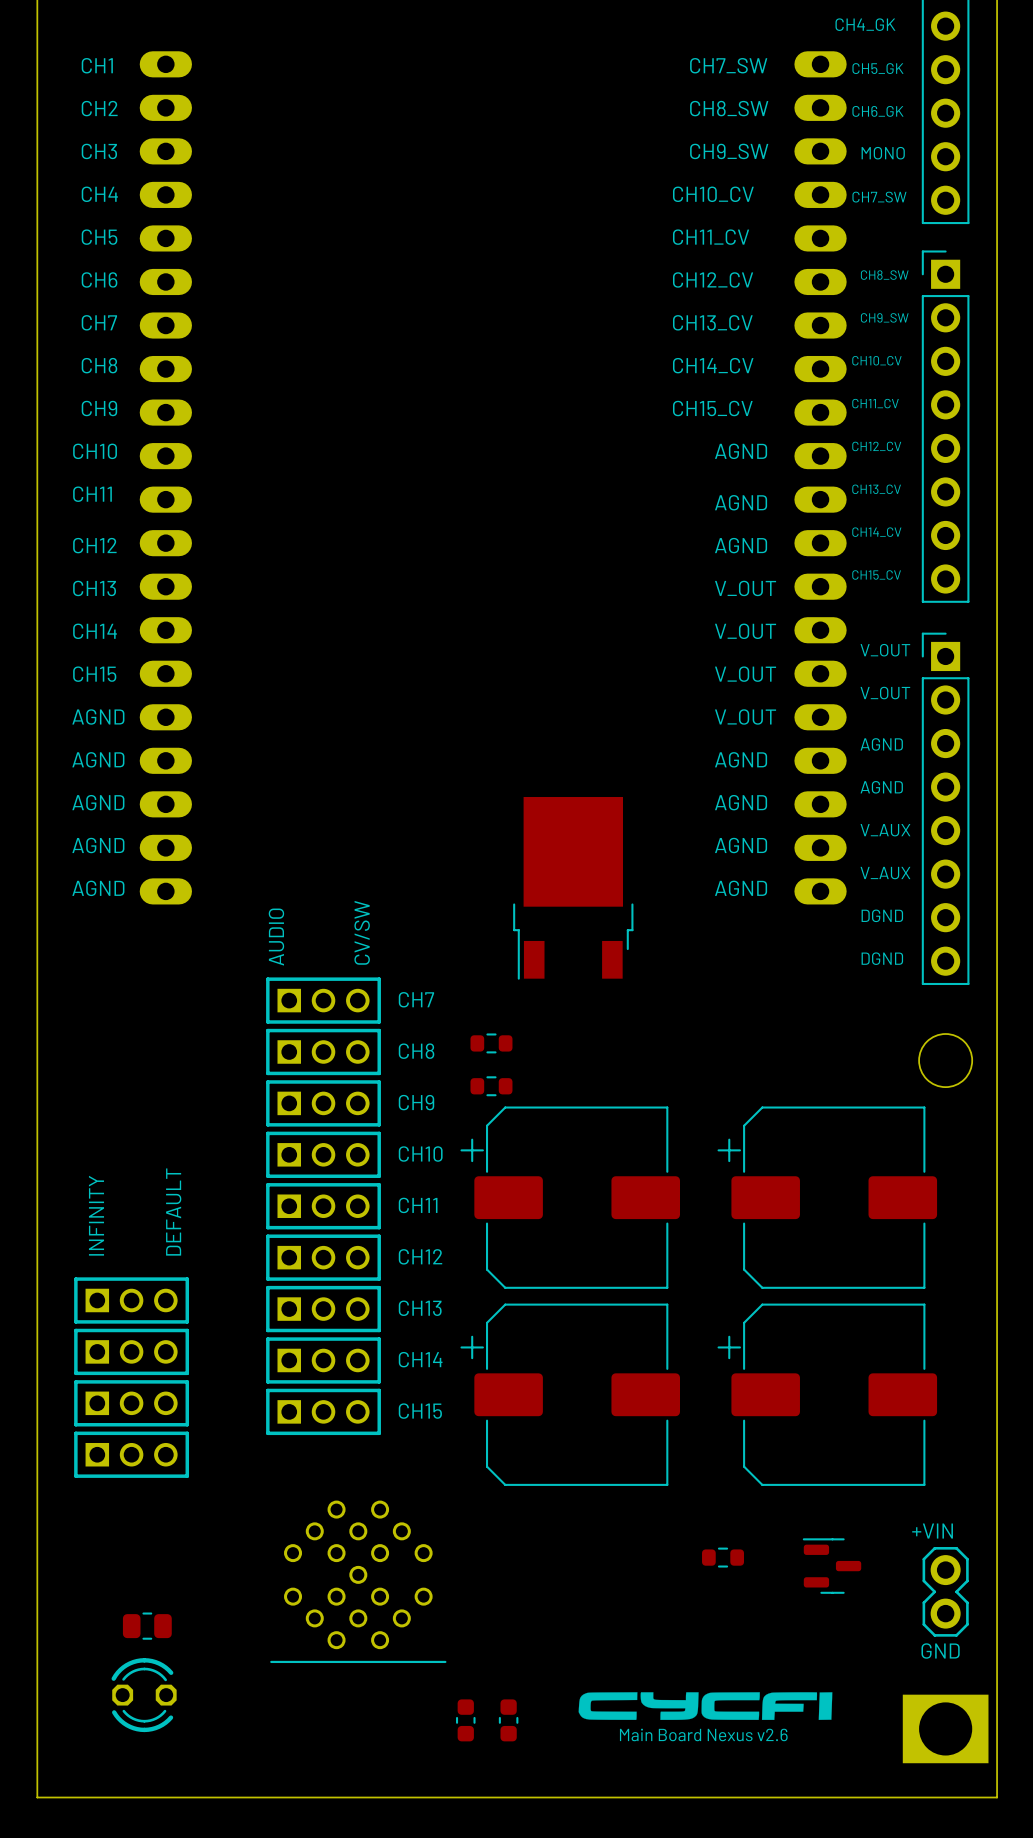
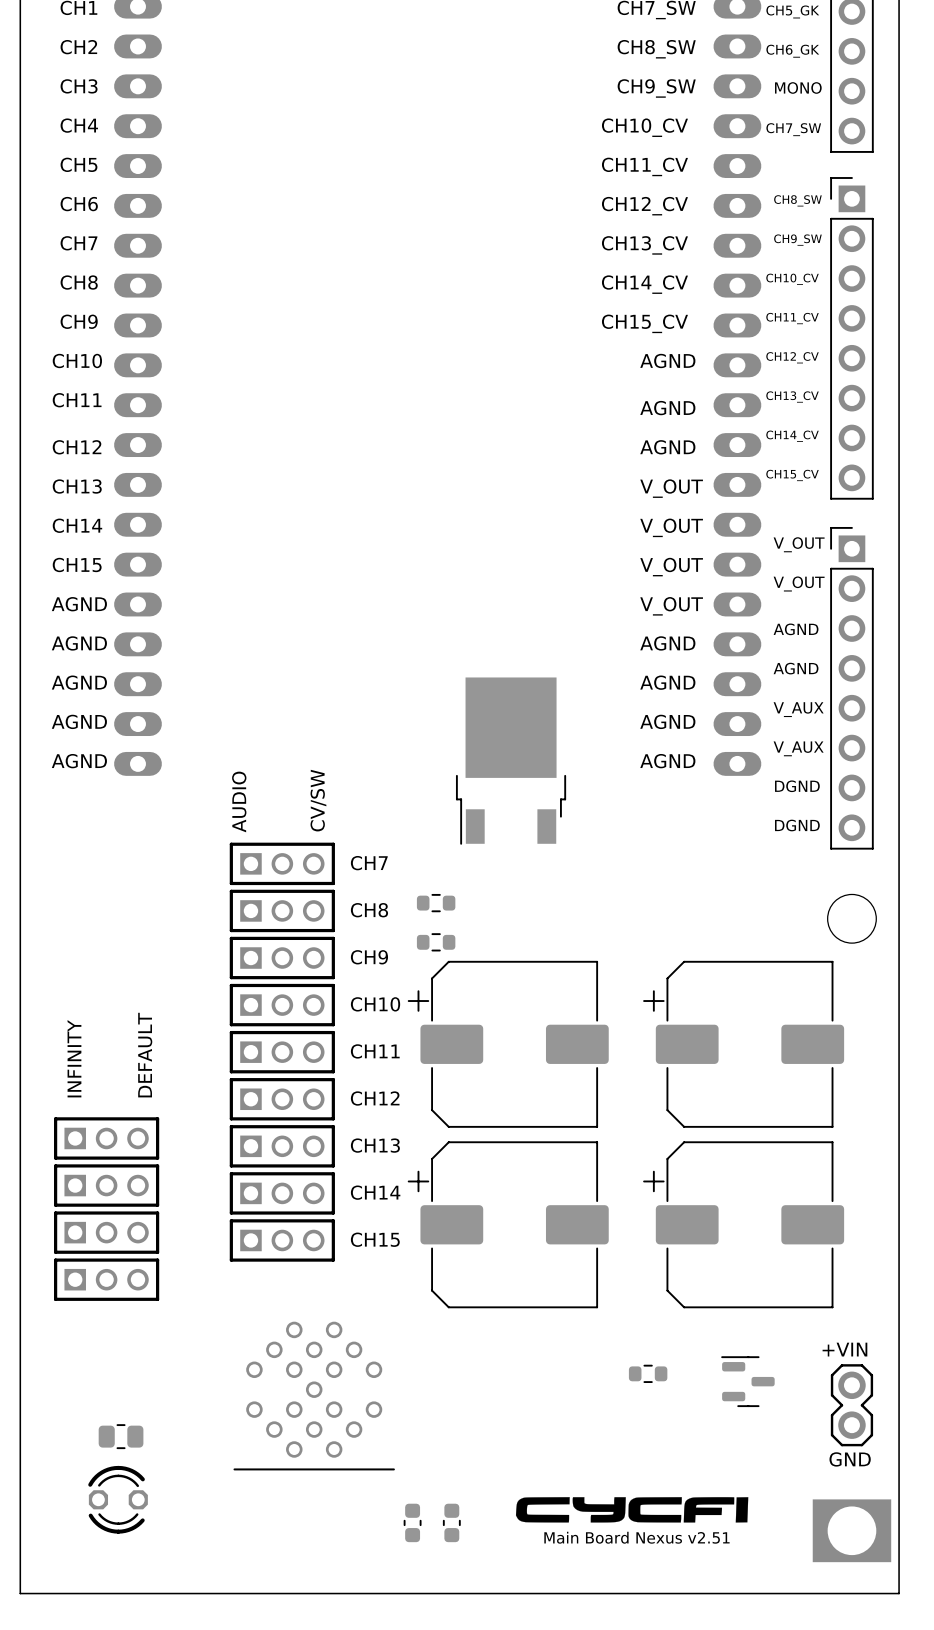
text: Main Board Nexus v2.6 (703, 1734) -> Main Board Nexus v2.51 (636, 1537)

